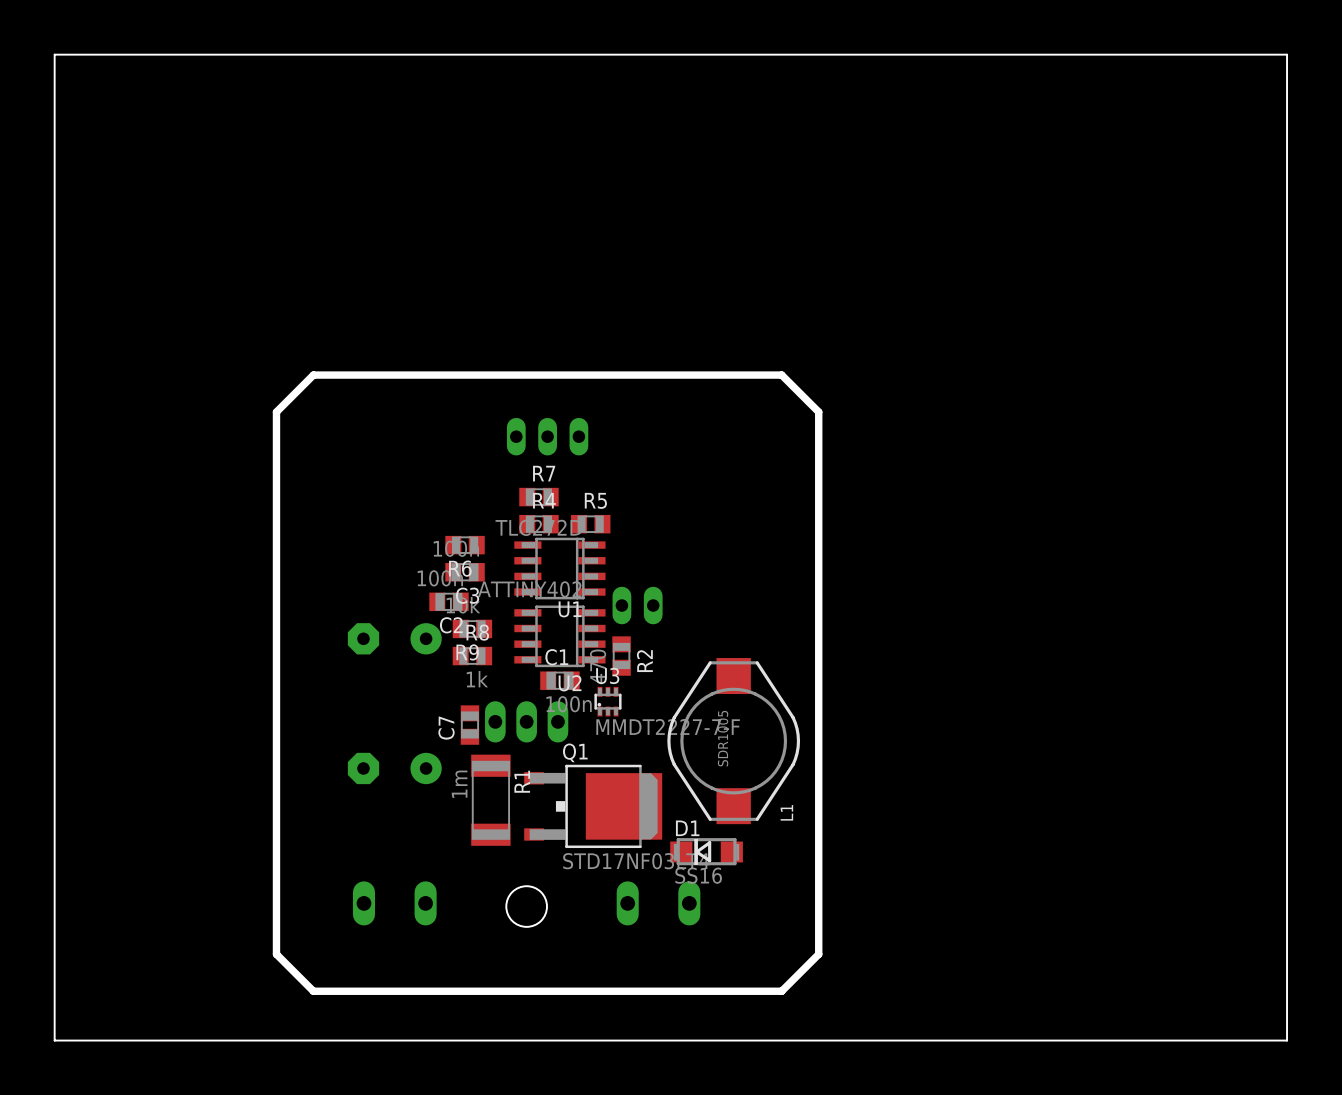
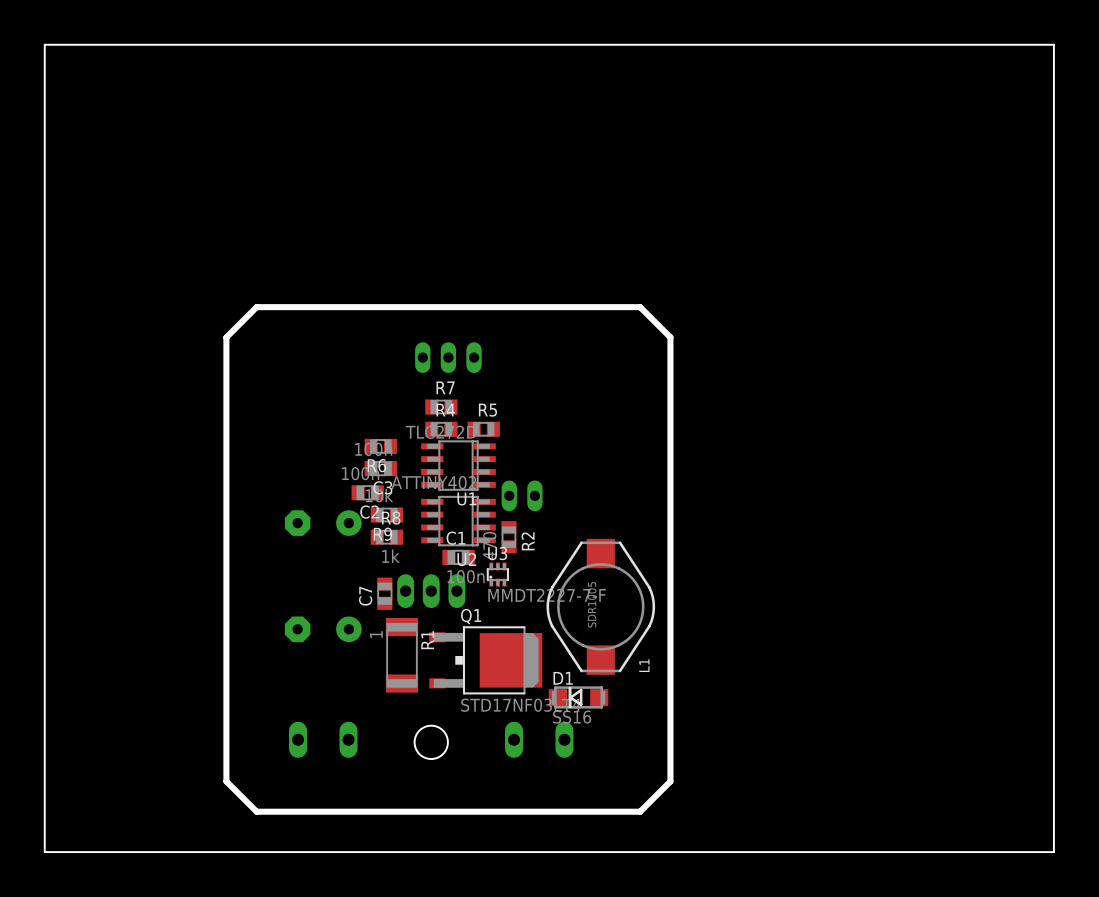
R1 value: 1m (459, 784) -> 1 (376, 634)

